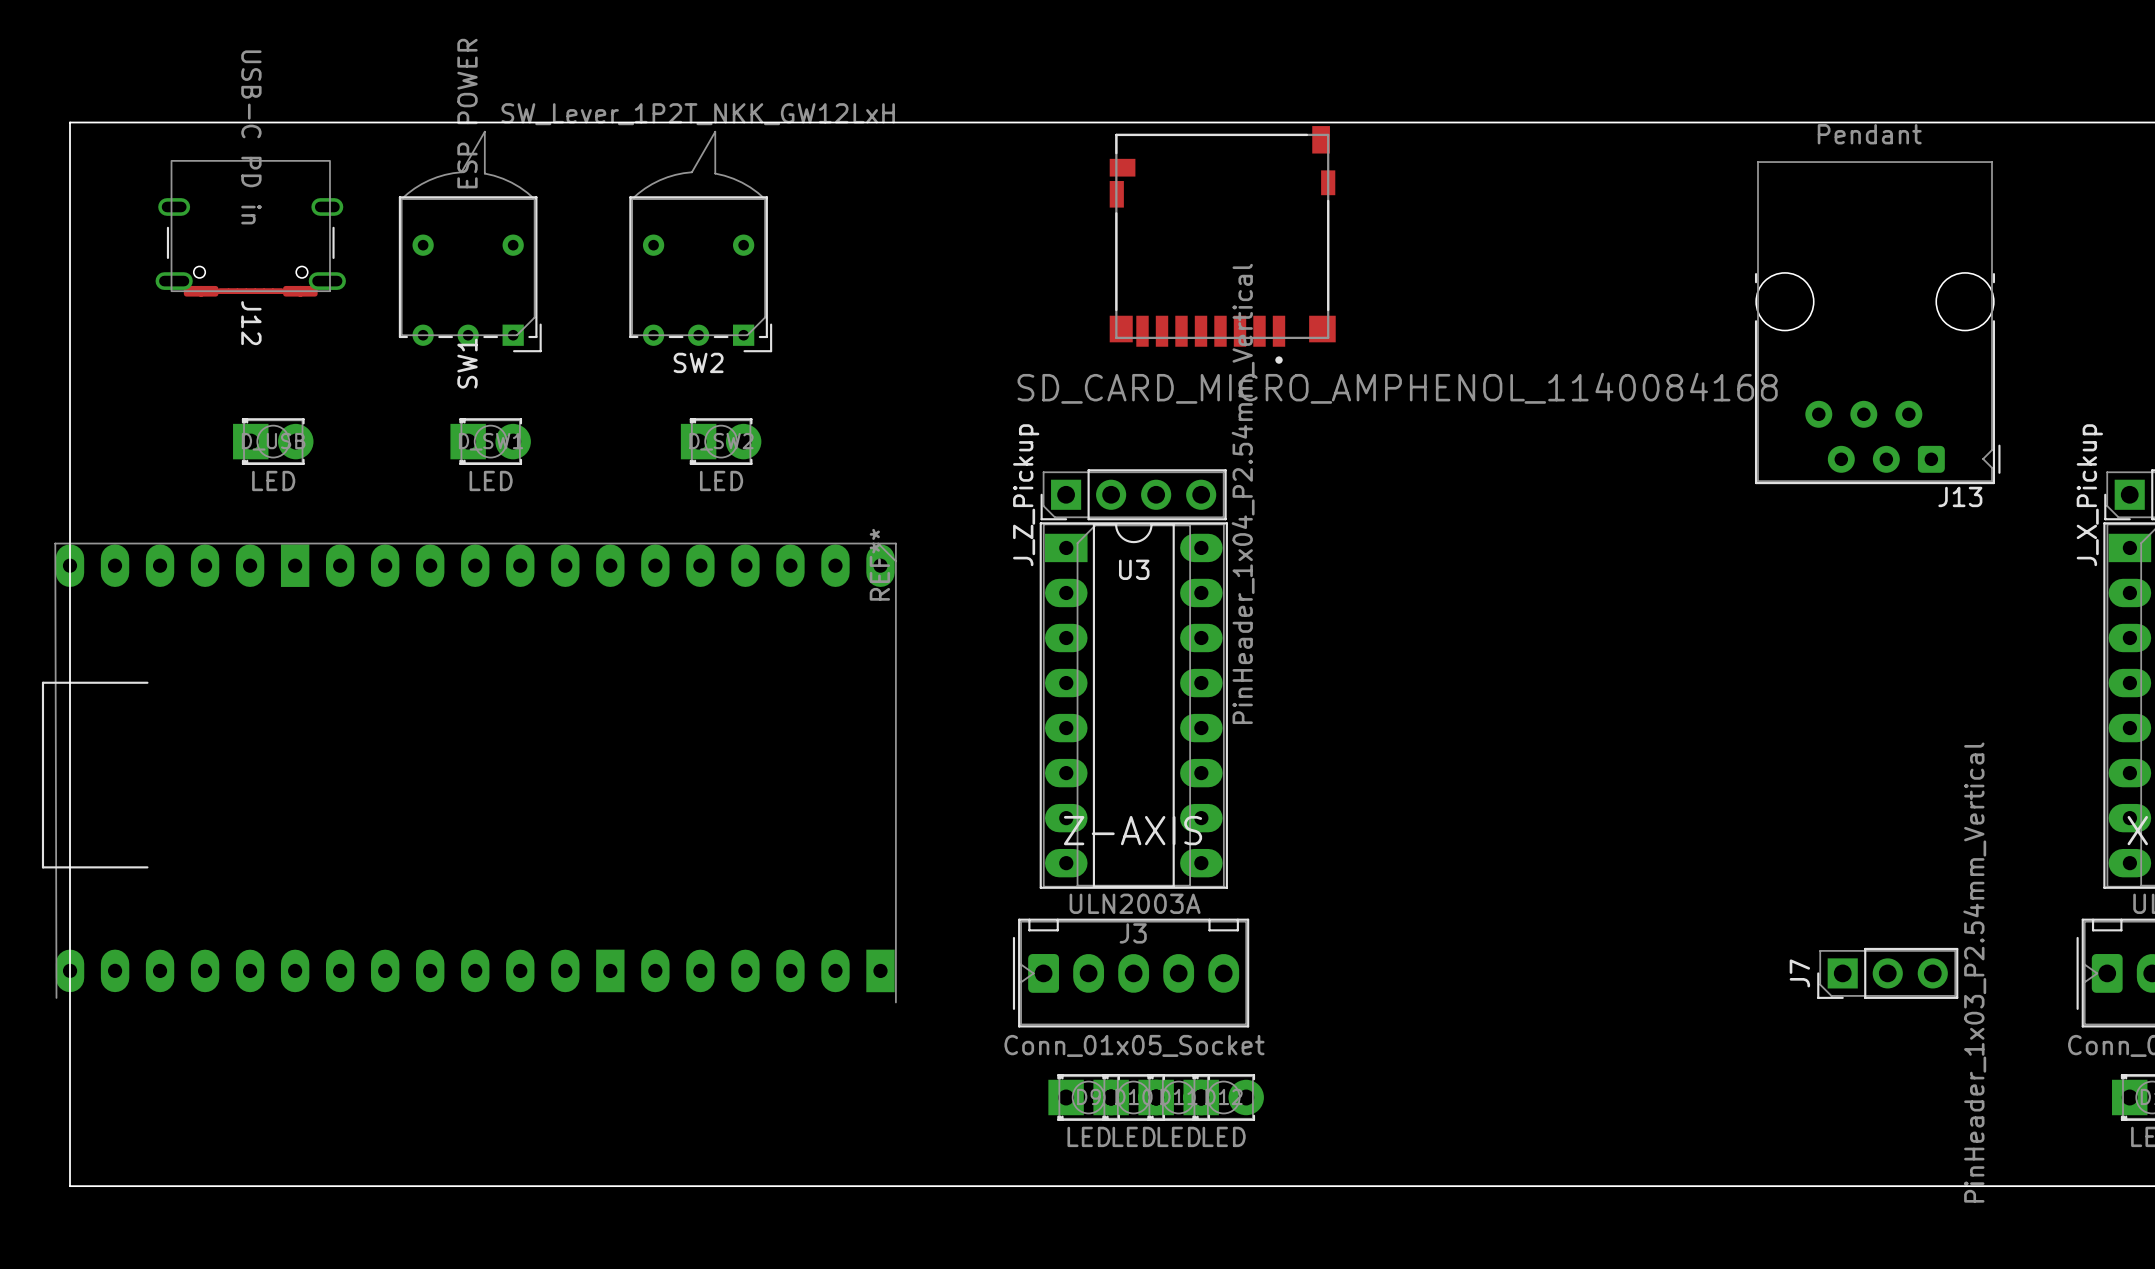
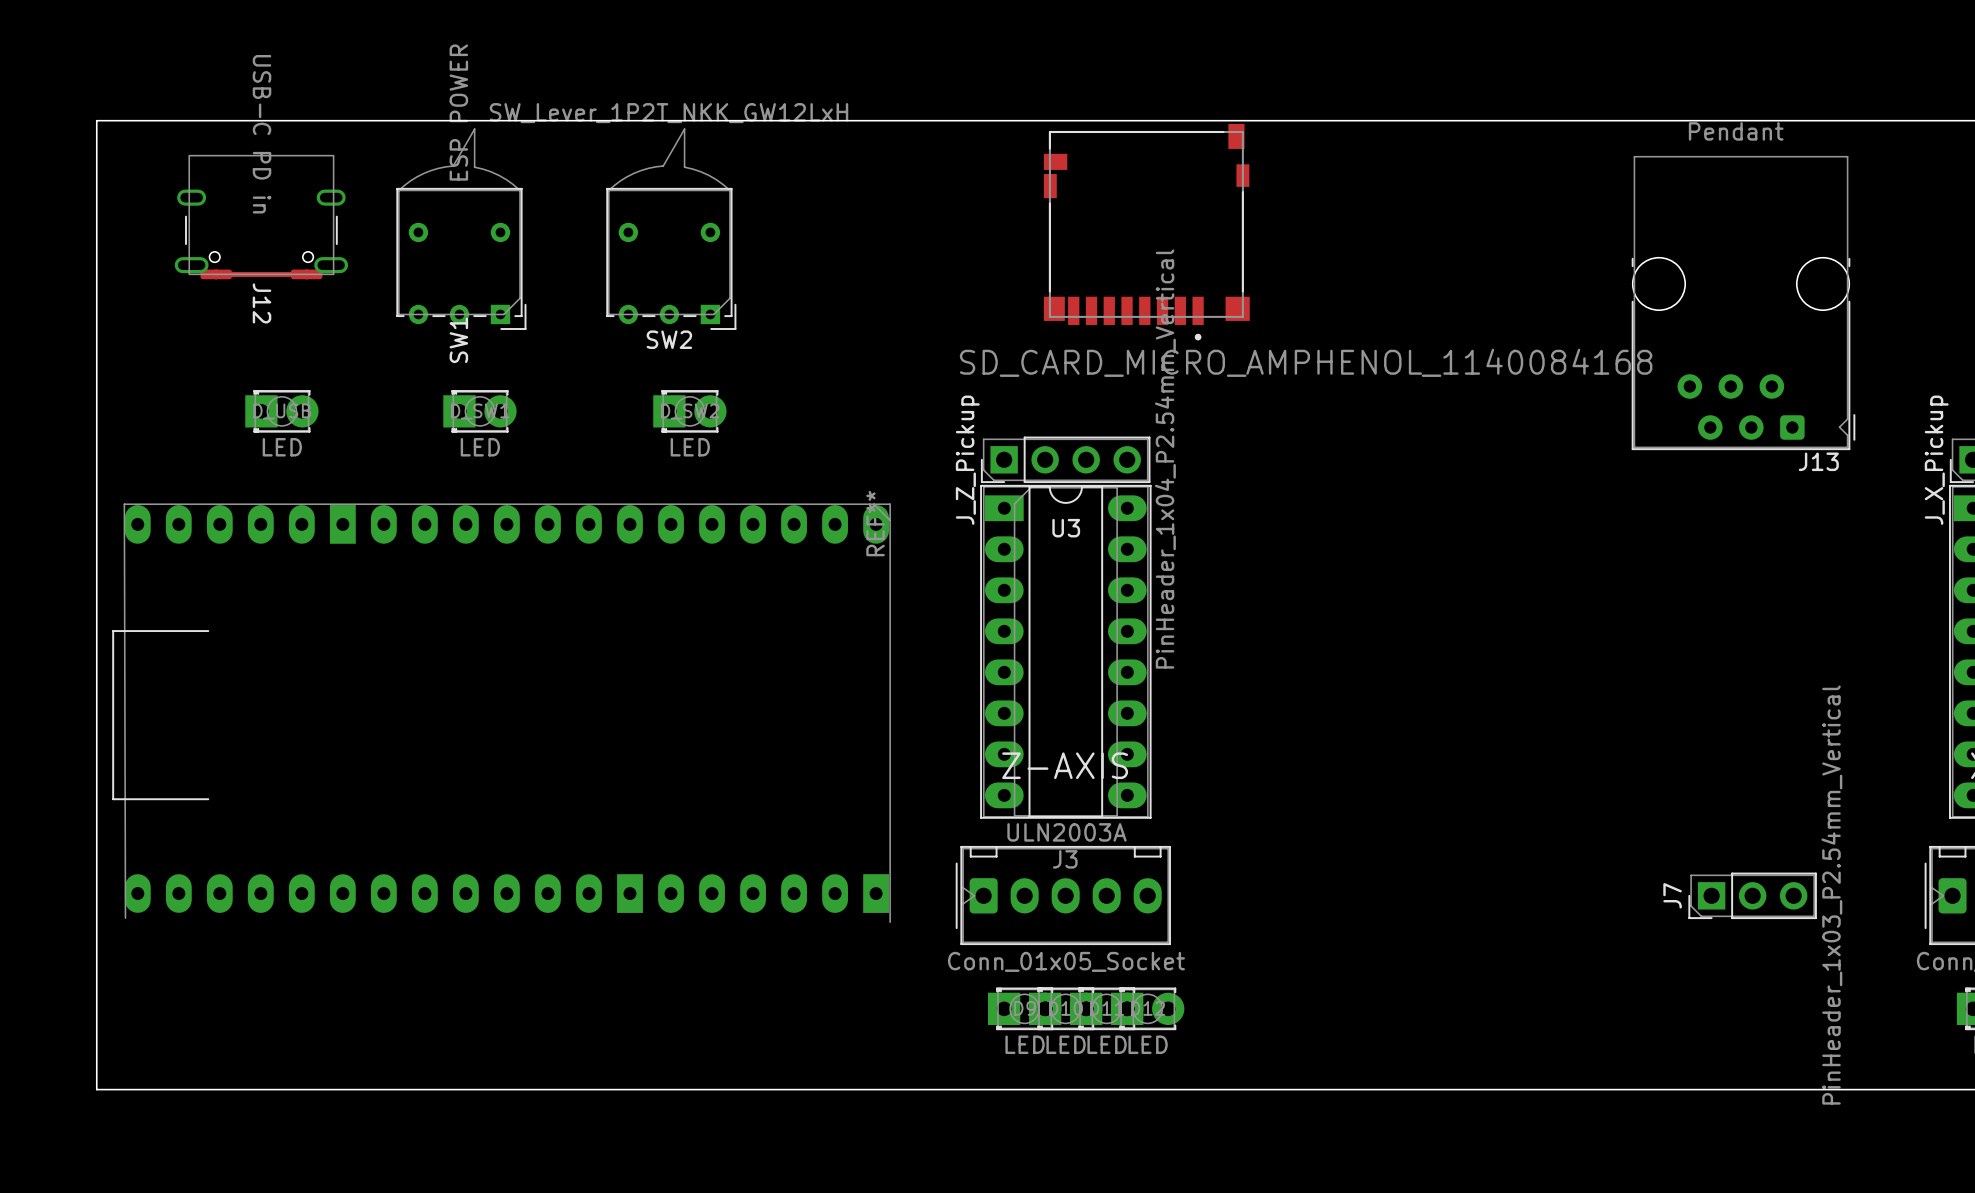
part position: (469, 772) -> (501, 713)

